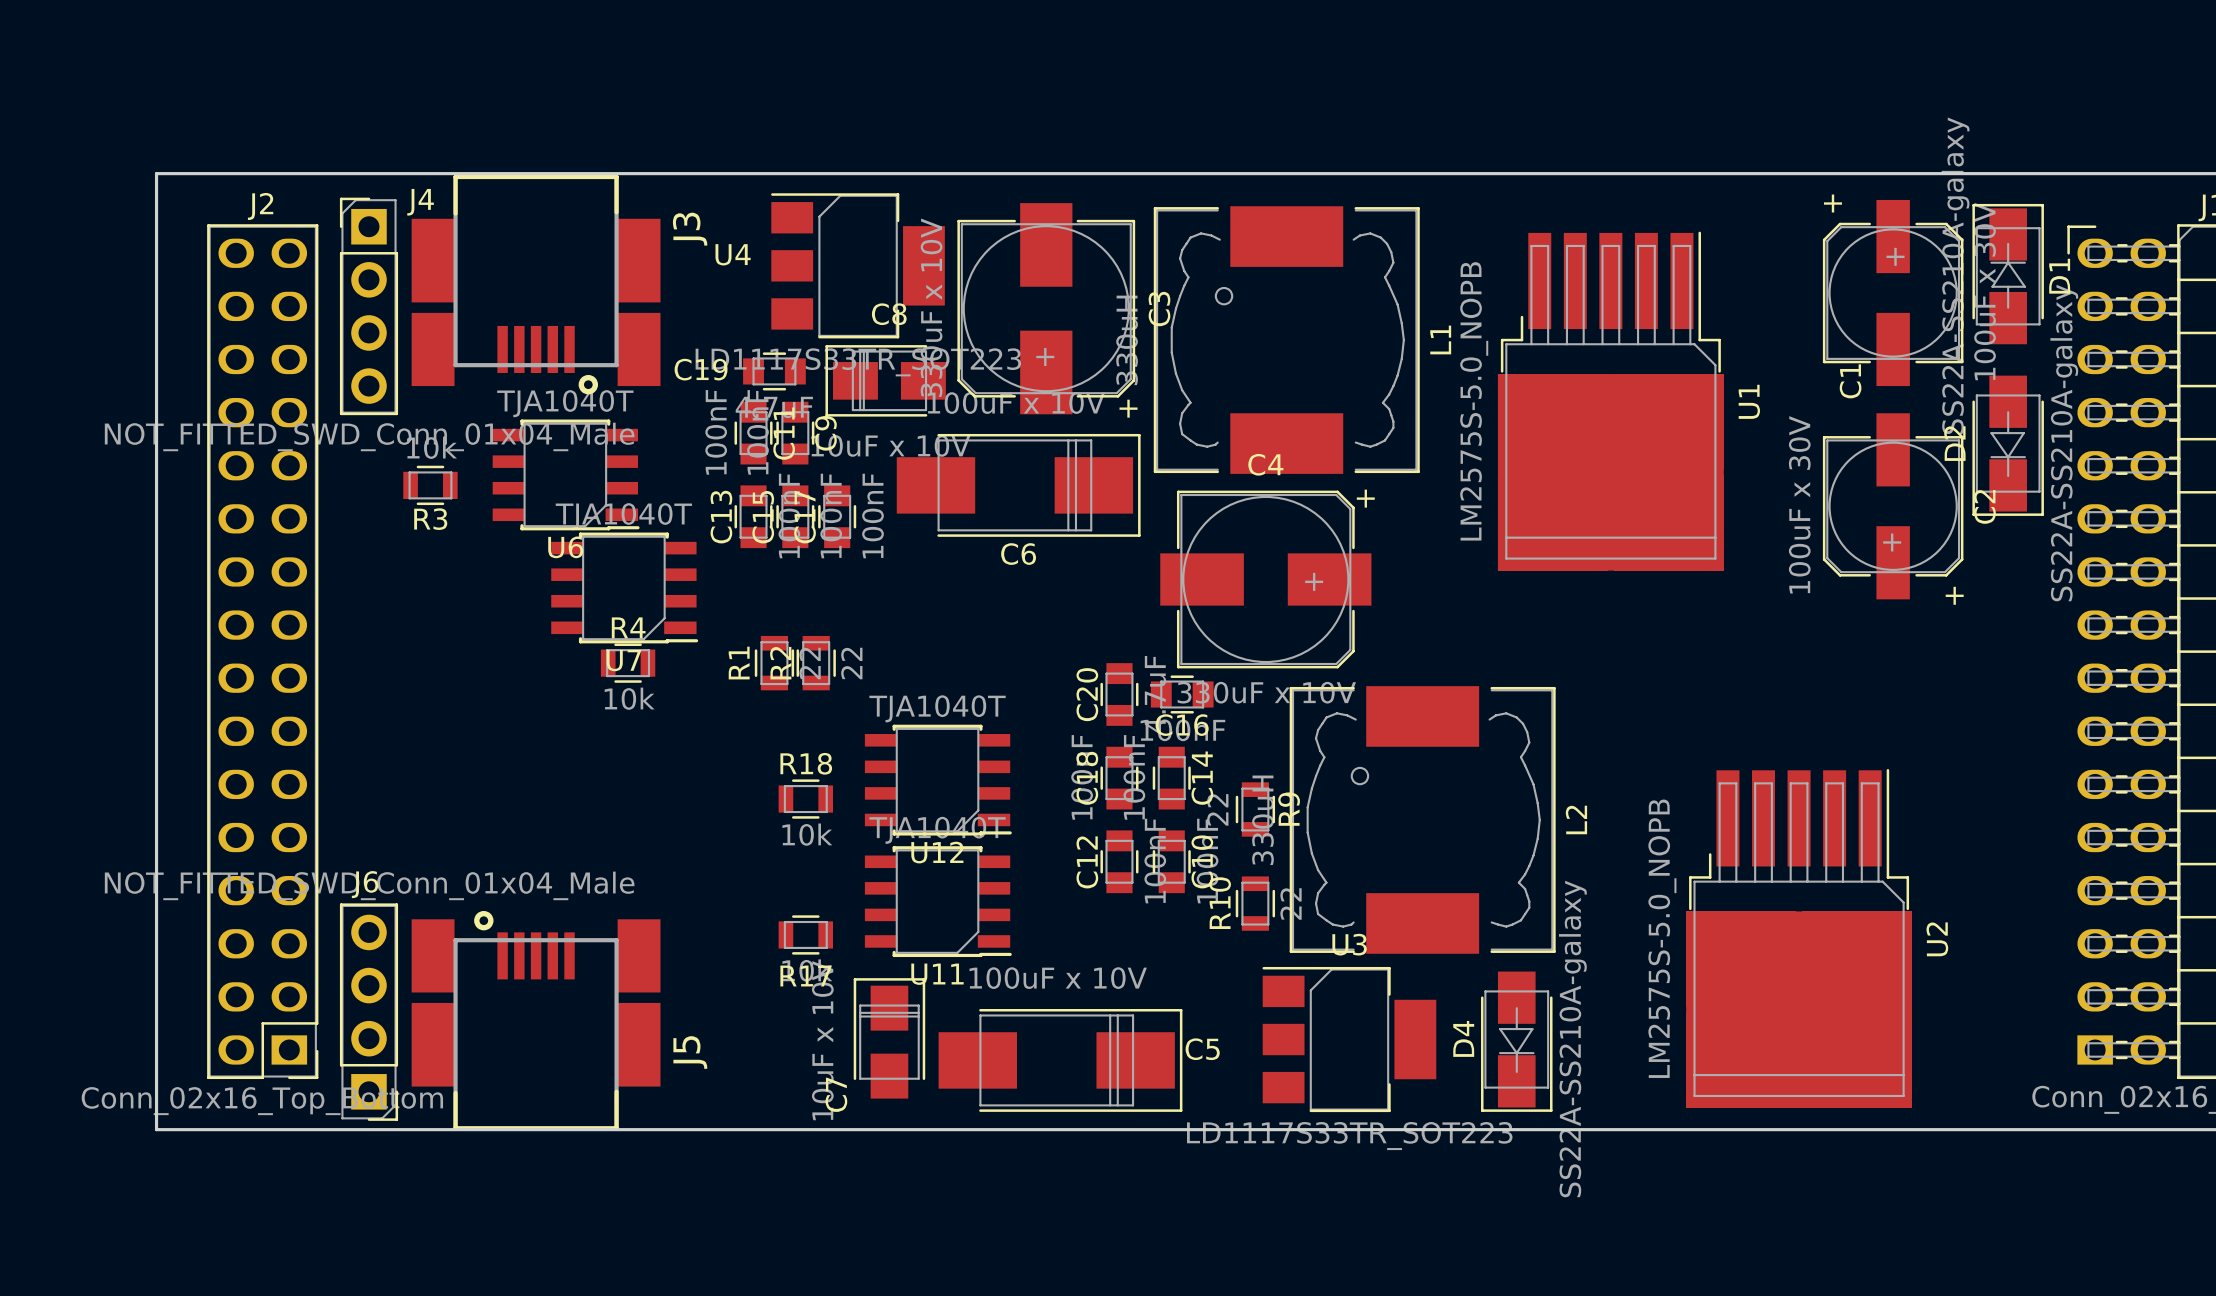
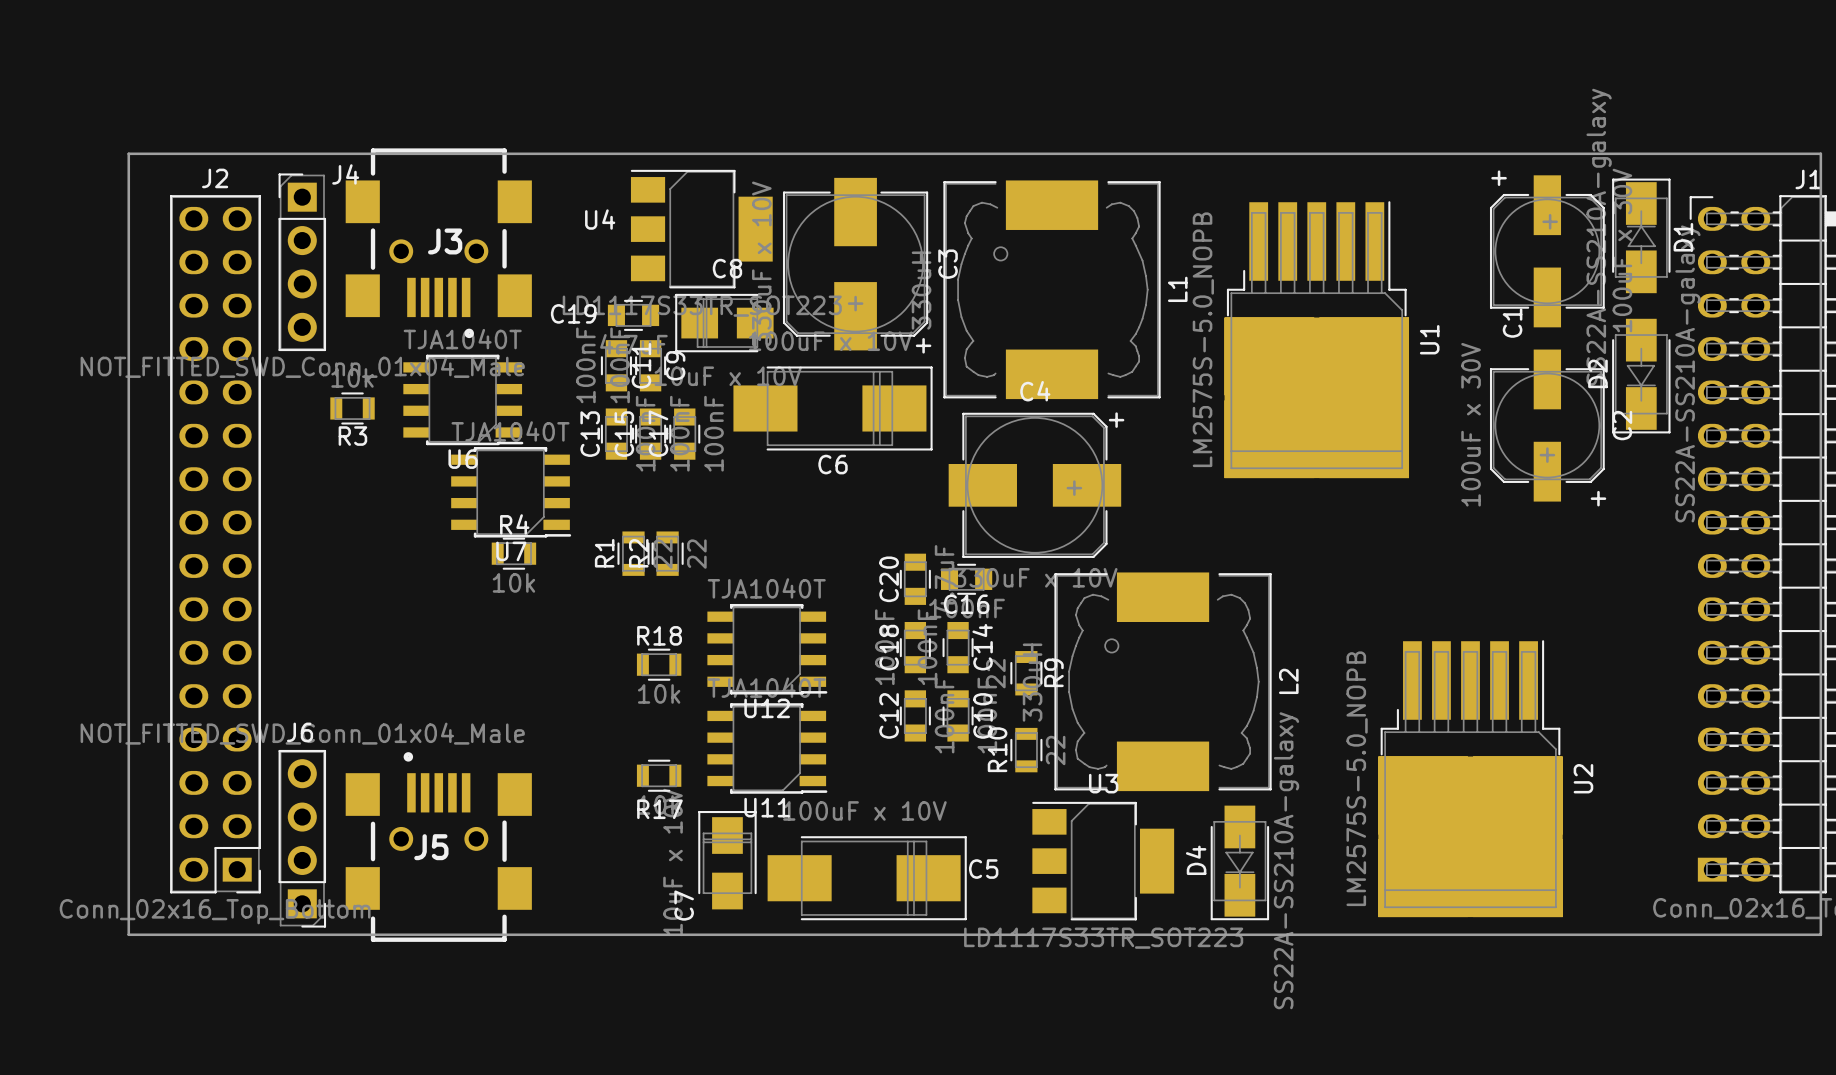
J3 footprint: [411, 174, 661, 395] -> [345, 148, 532, 339]
J3 name position: J3 (690, 229) -> J3 (445, 241)
J5 footprint: [411, 911, 661, 1131] -> [345, 752, 532, 942]
J5 name position: J5 (690, 1052) -> J5 (431, 847)

